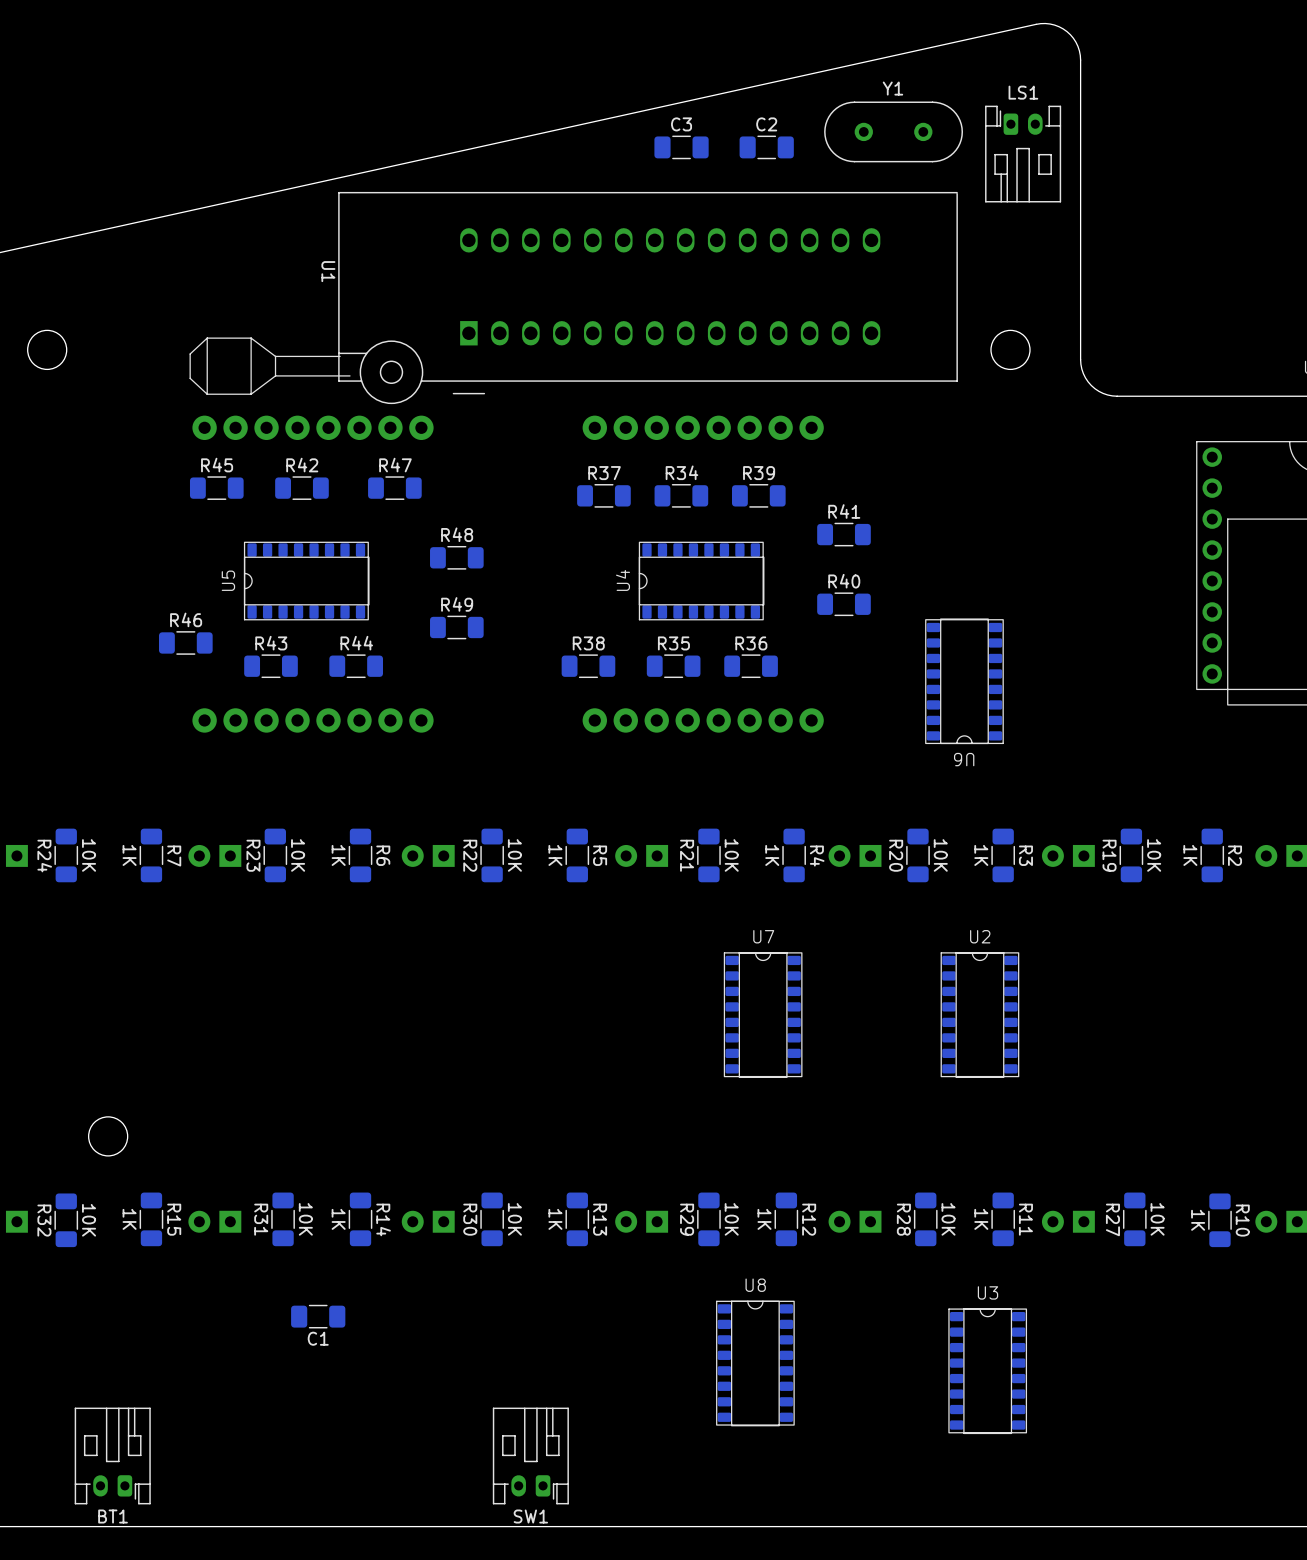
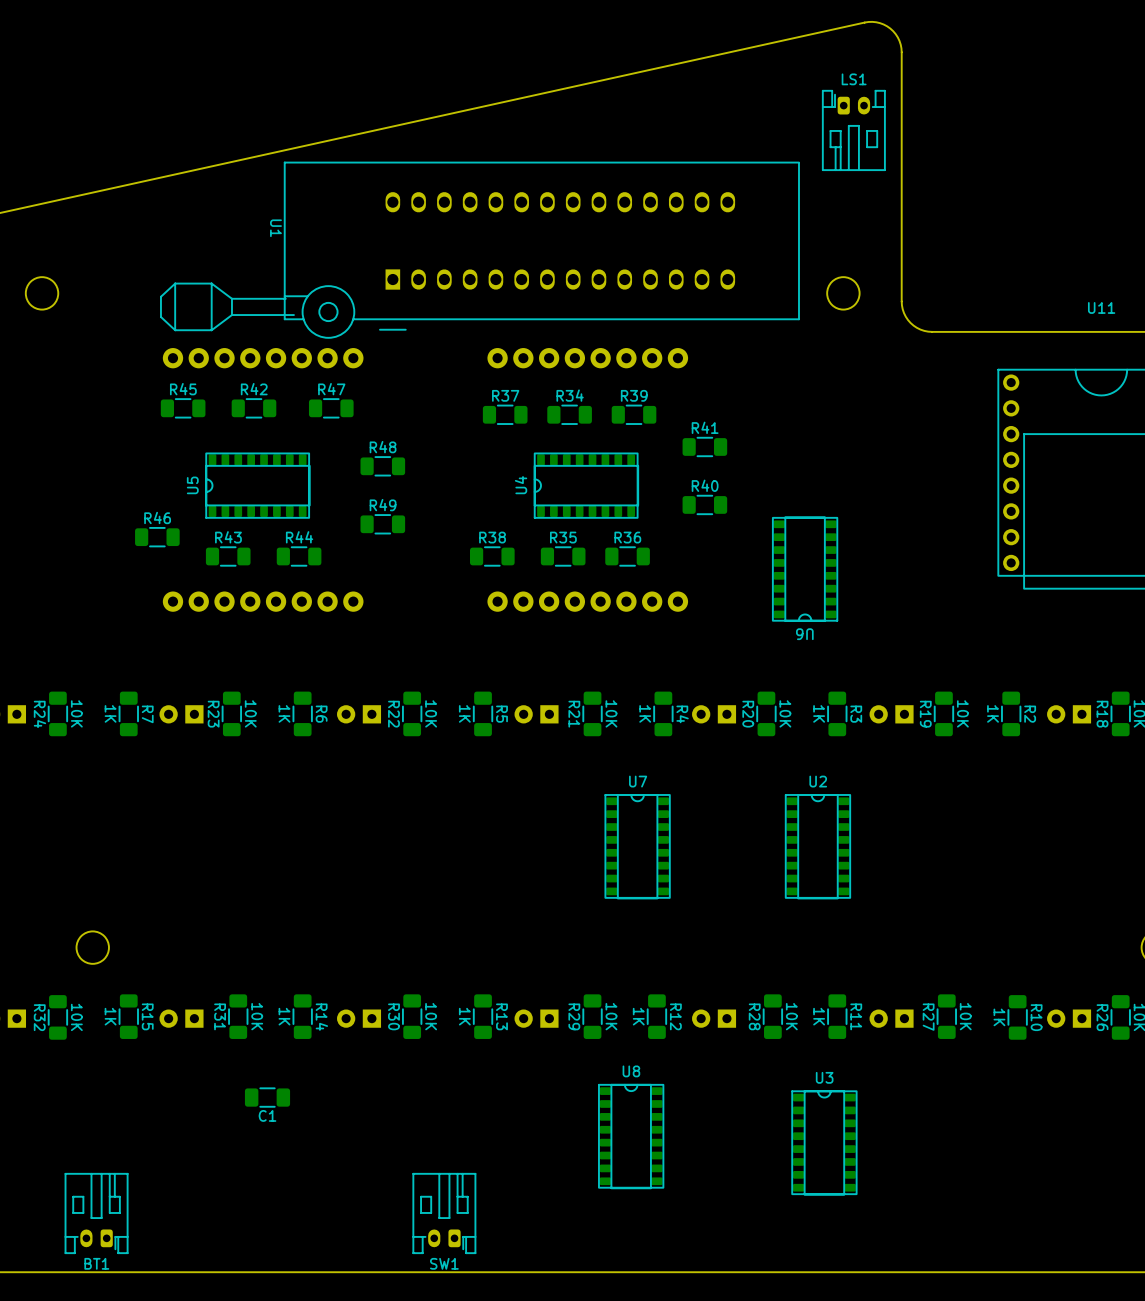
Y1: (893, 131) -> none
C3: (681, 147) -> none
C2: (766, 147) -> none

